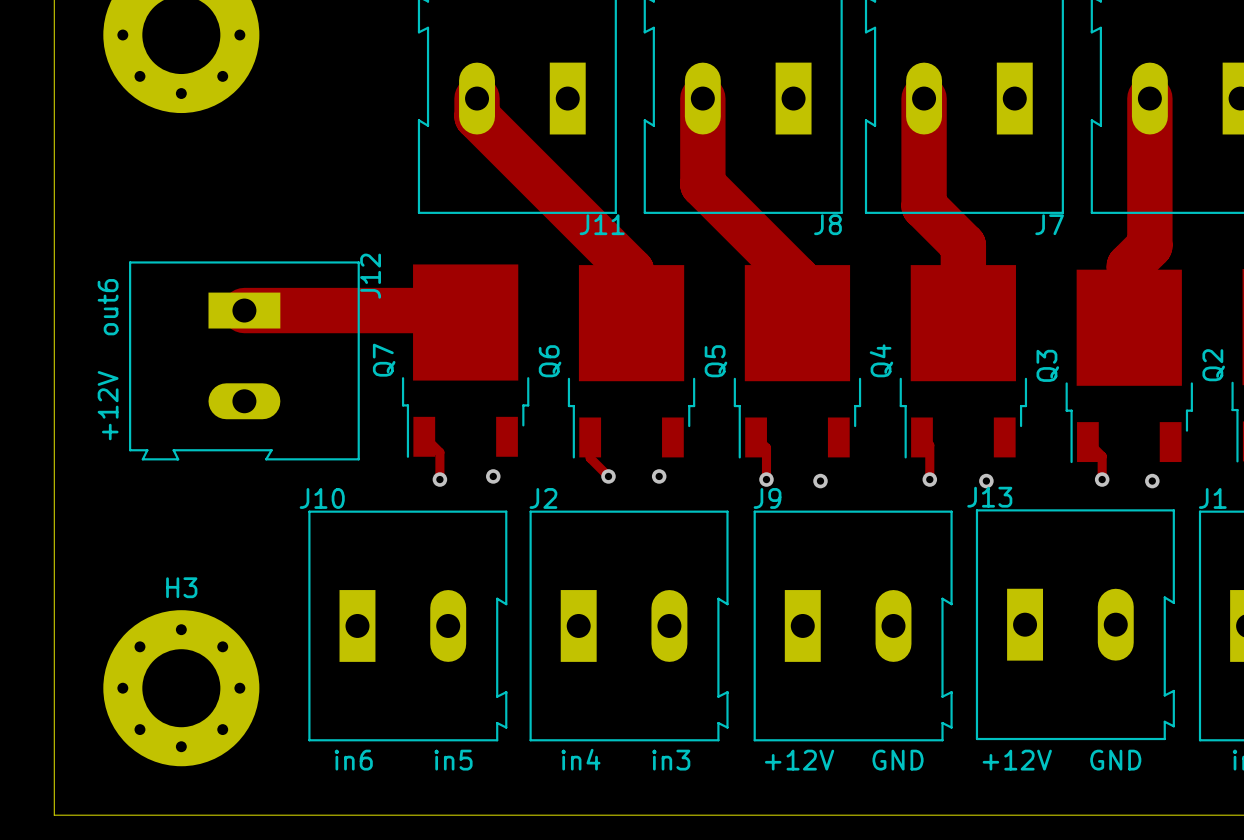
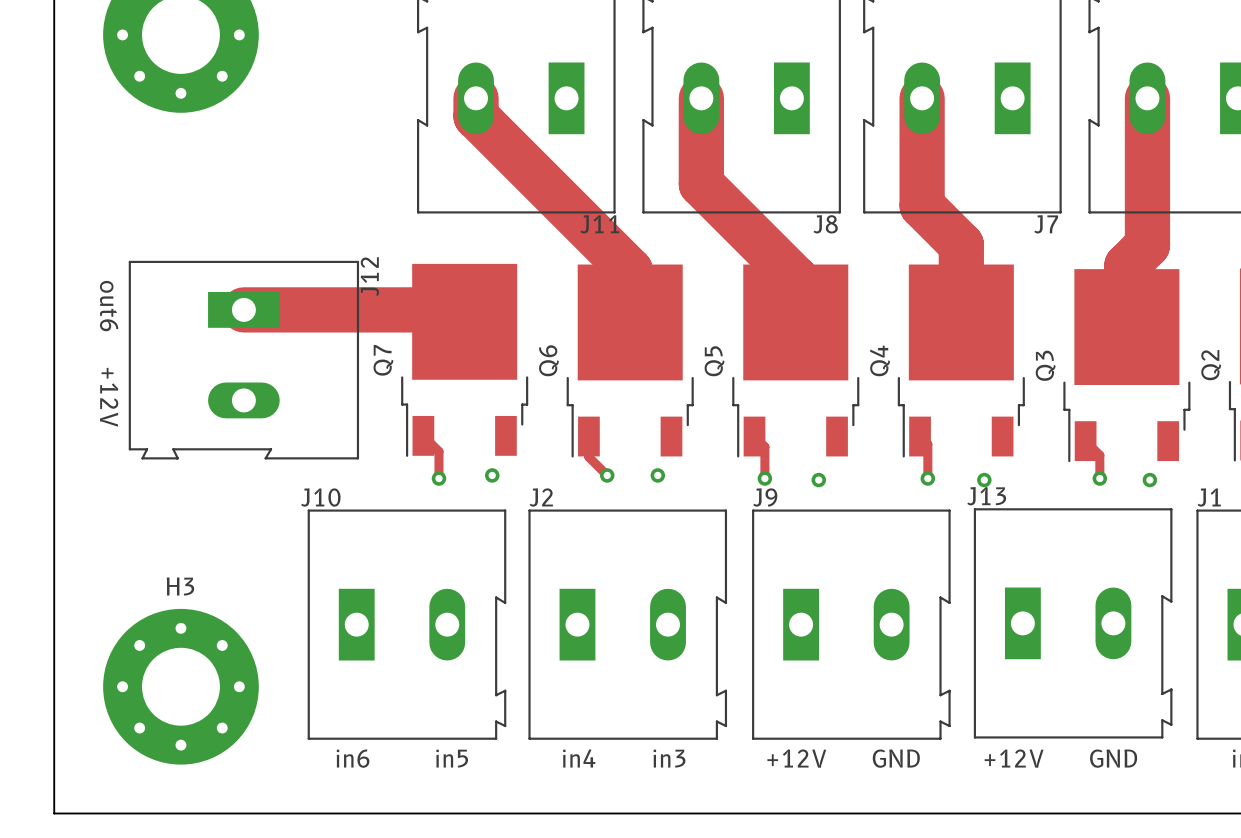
text rotation: 0° (108, 307) -> 180° (109, 306)
text rotation: 0° (108, 405) -> 180° (109, 397)

